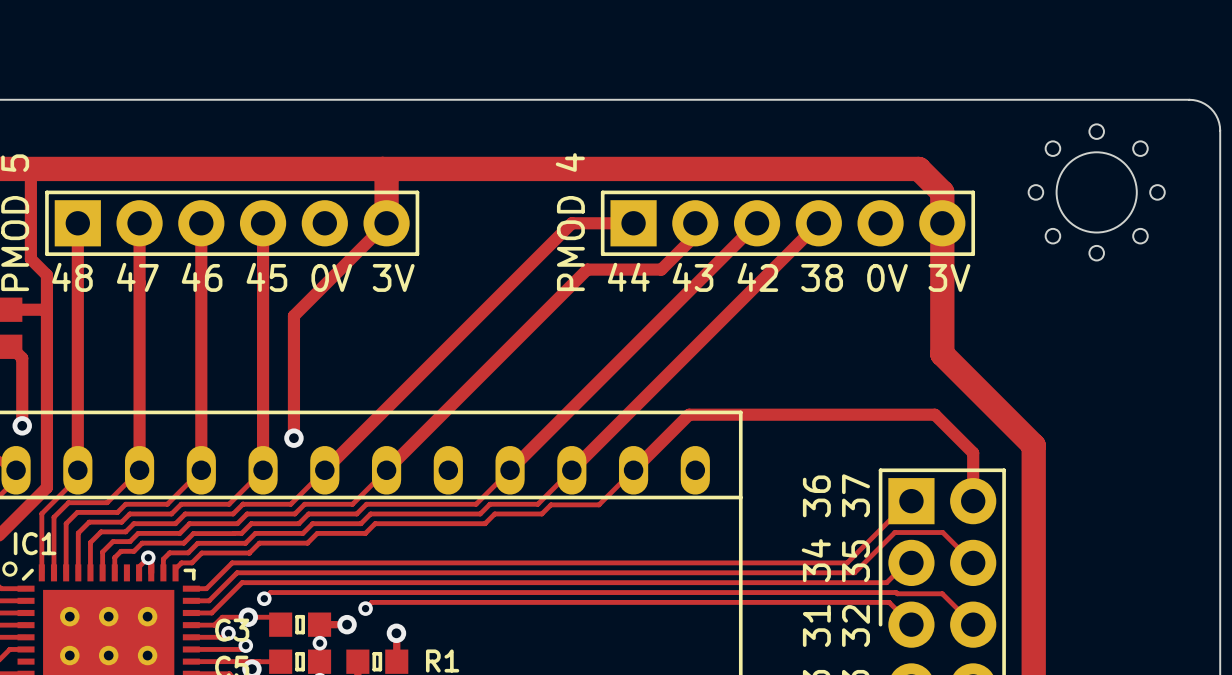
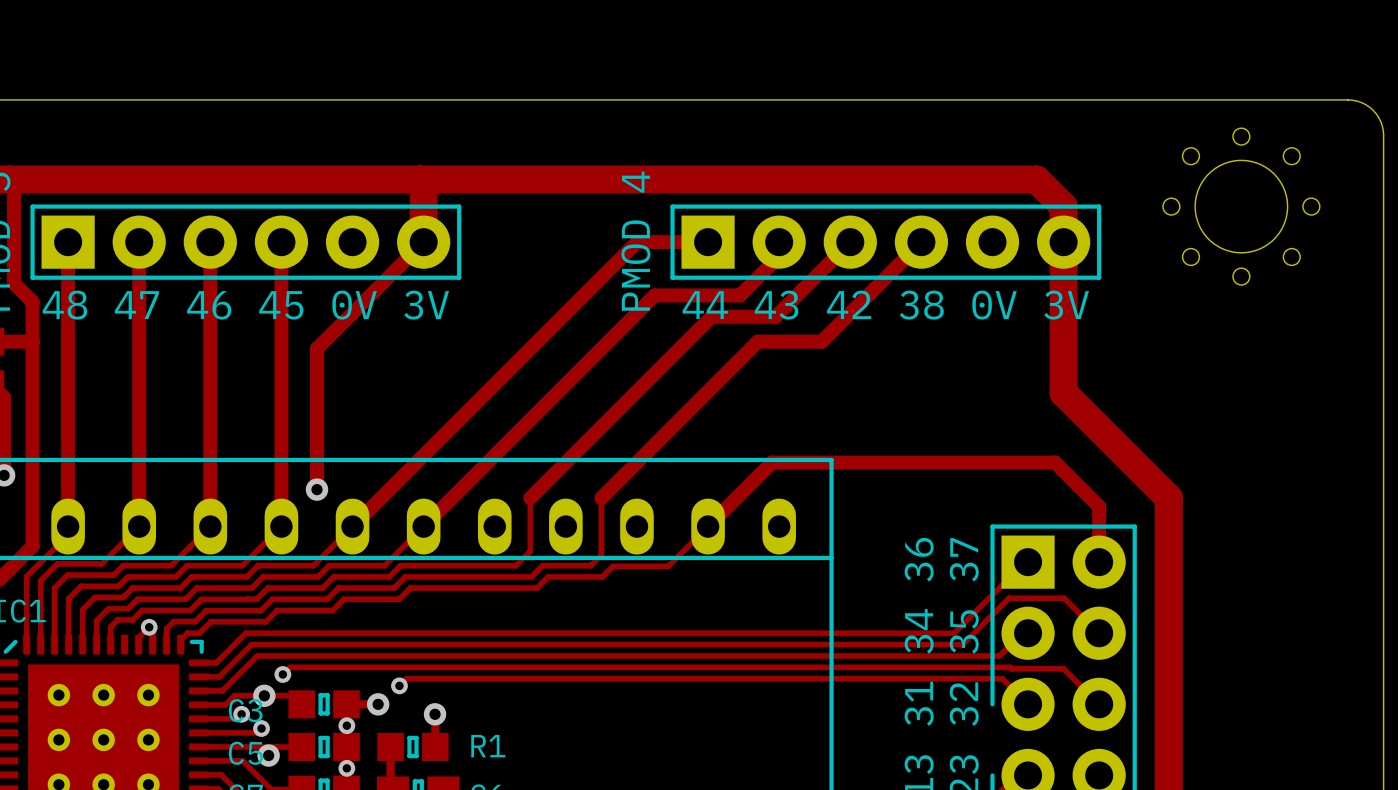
track: (692, 288) (476, 504) (466, 504) -> (775, 316) (711, 316) (530, 498) (530, 551) (516, 565)
track: (732, 309) (537, 504) (531, 504) -> (821, 341) (757, 341) (601, 498) (601, 555) (590, 565)

